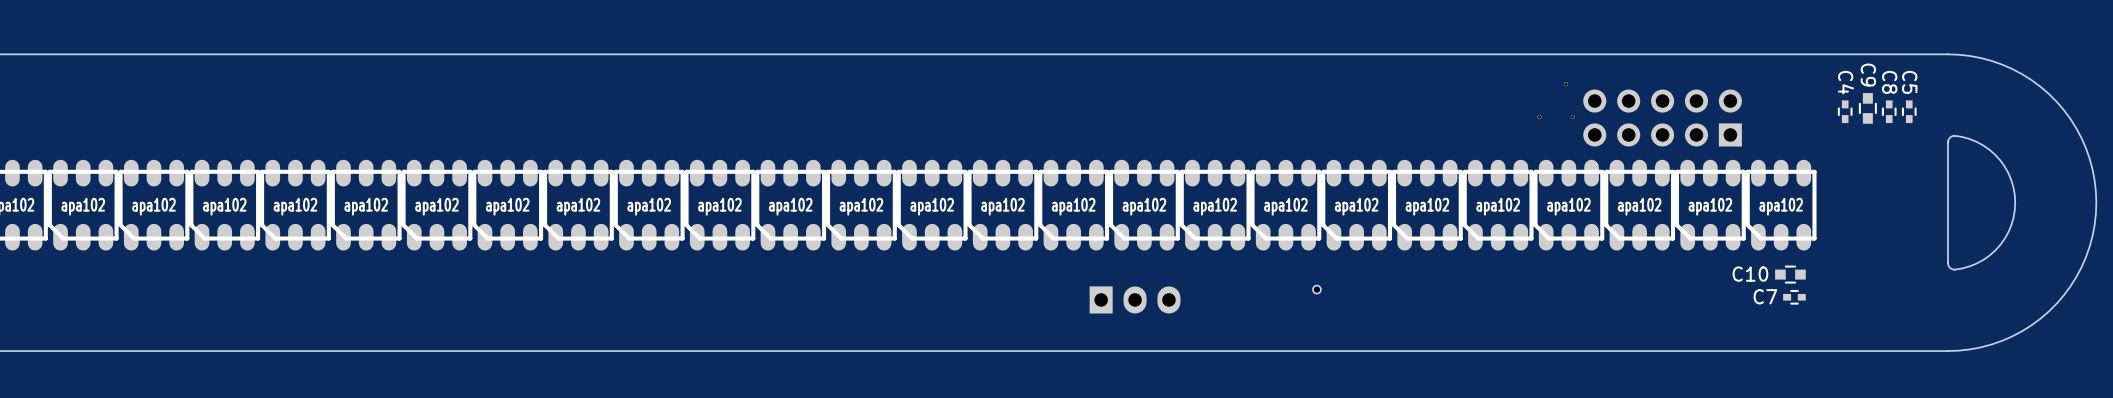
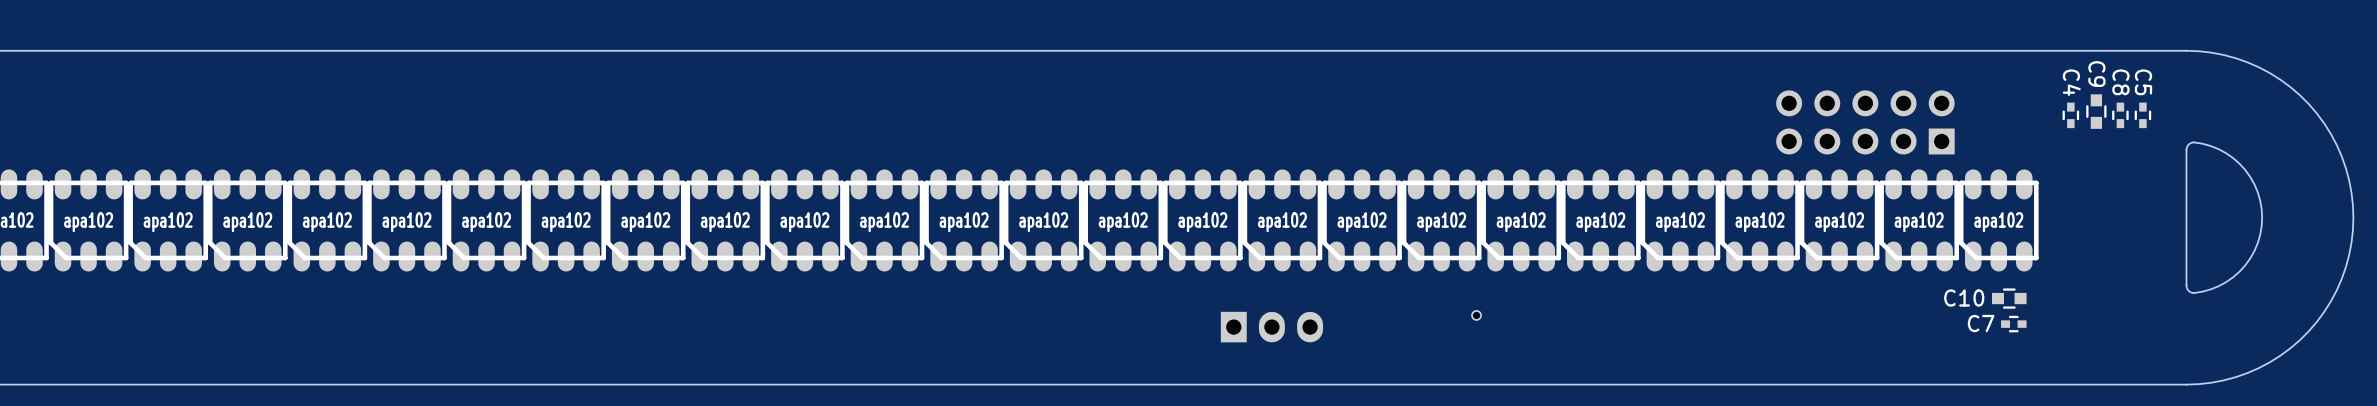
part: (1556, 100) -> none

